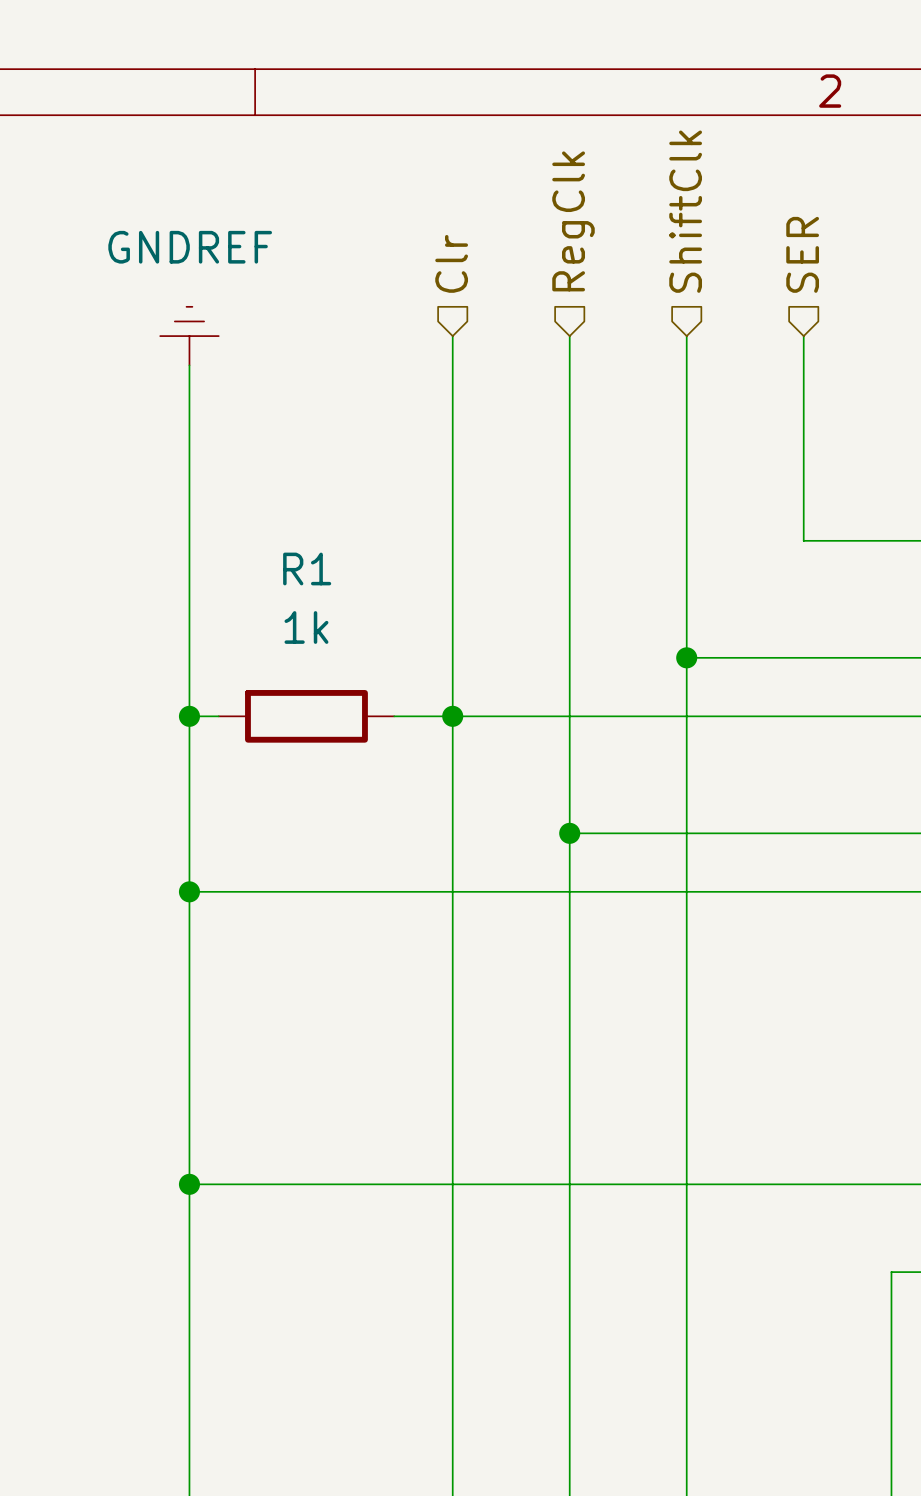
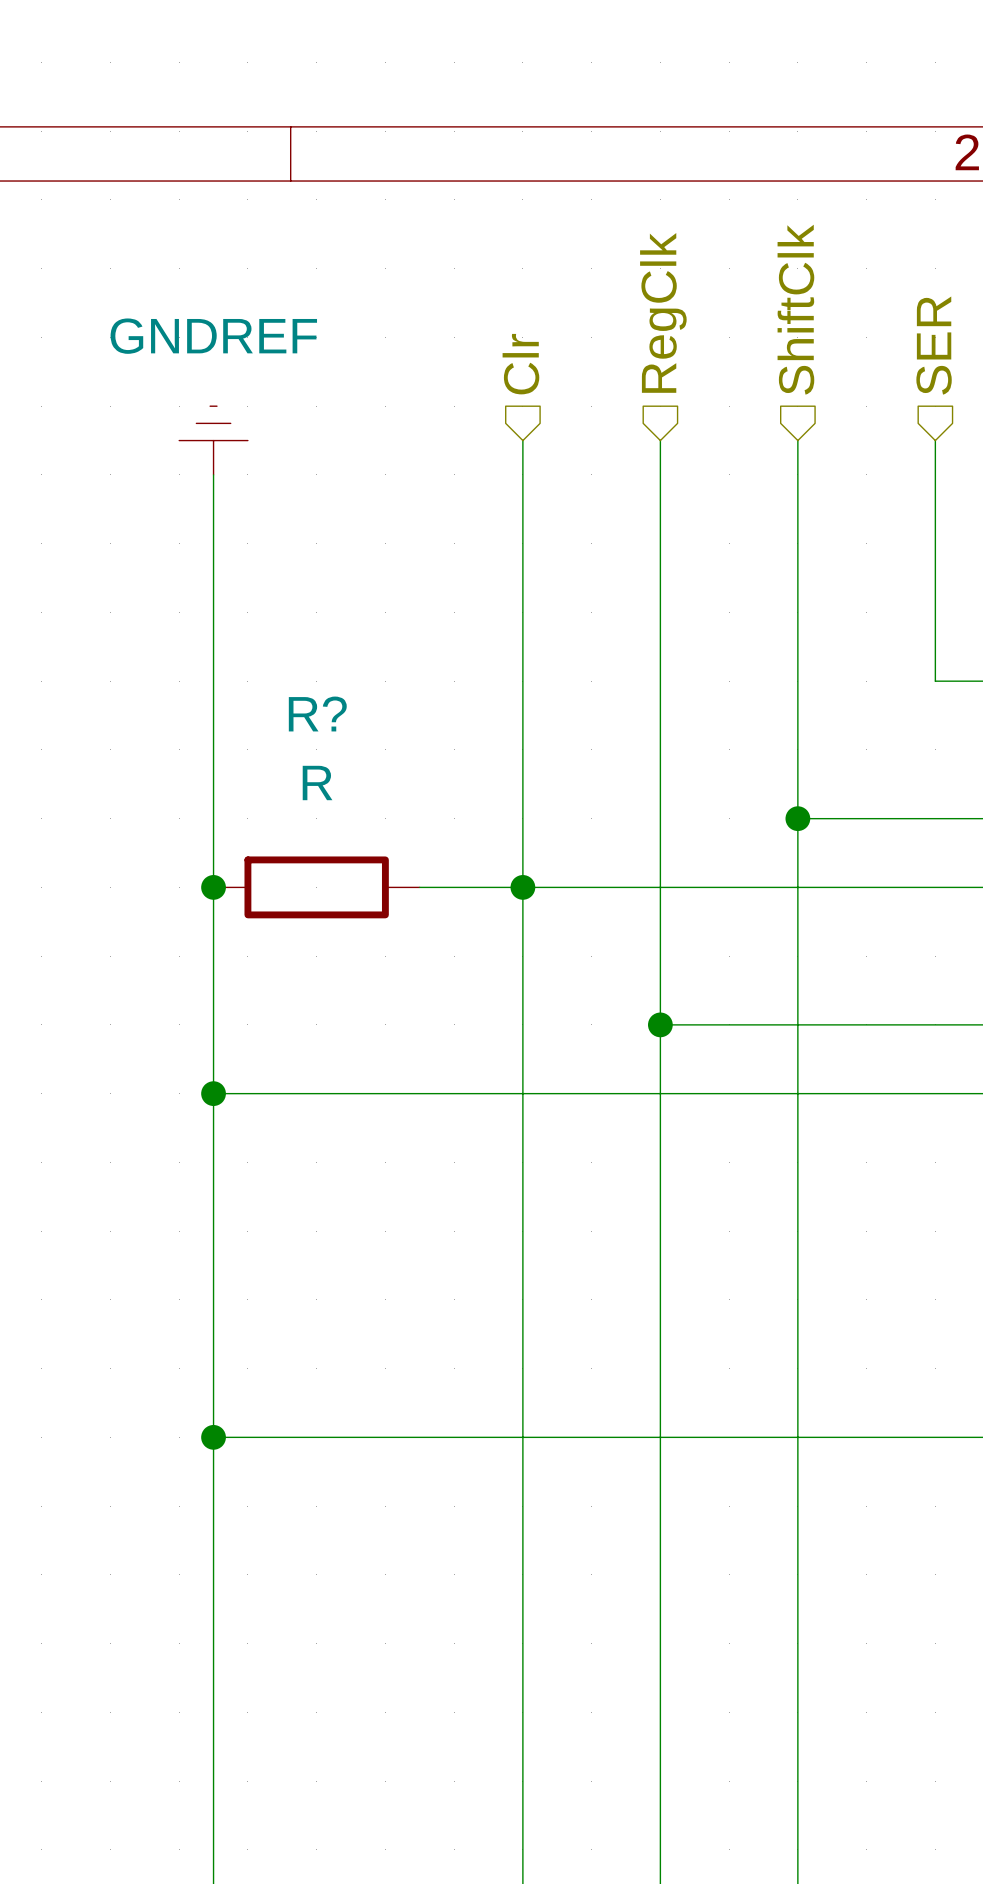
R?: none -> R (316, 887)
R1: 1k (306, 716) -> none

